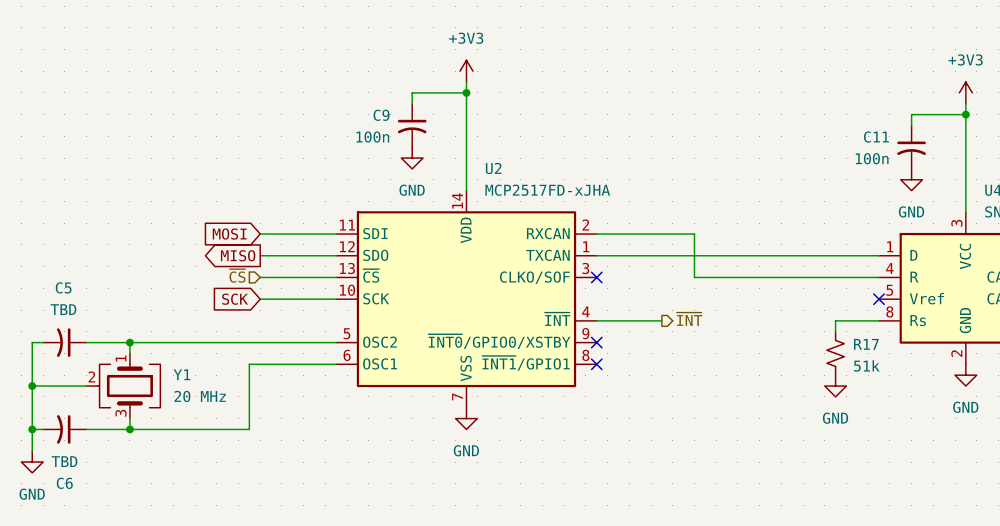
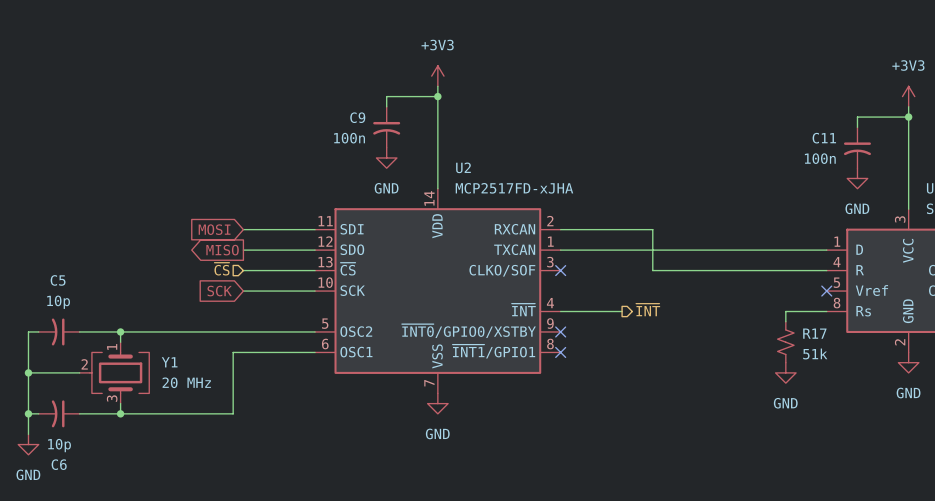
C5 value: TBD (63, 309) -> 10p (58, 302)
C6 value: TBD (64, 461) -> 10p (59, 445)

